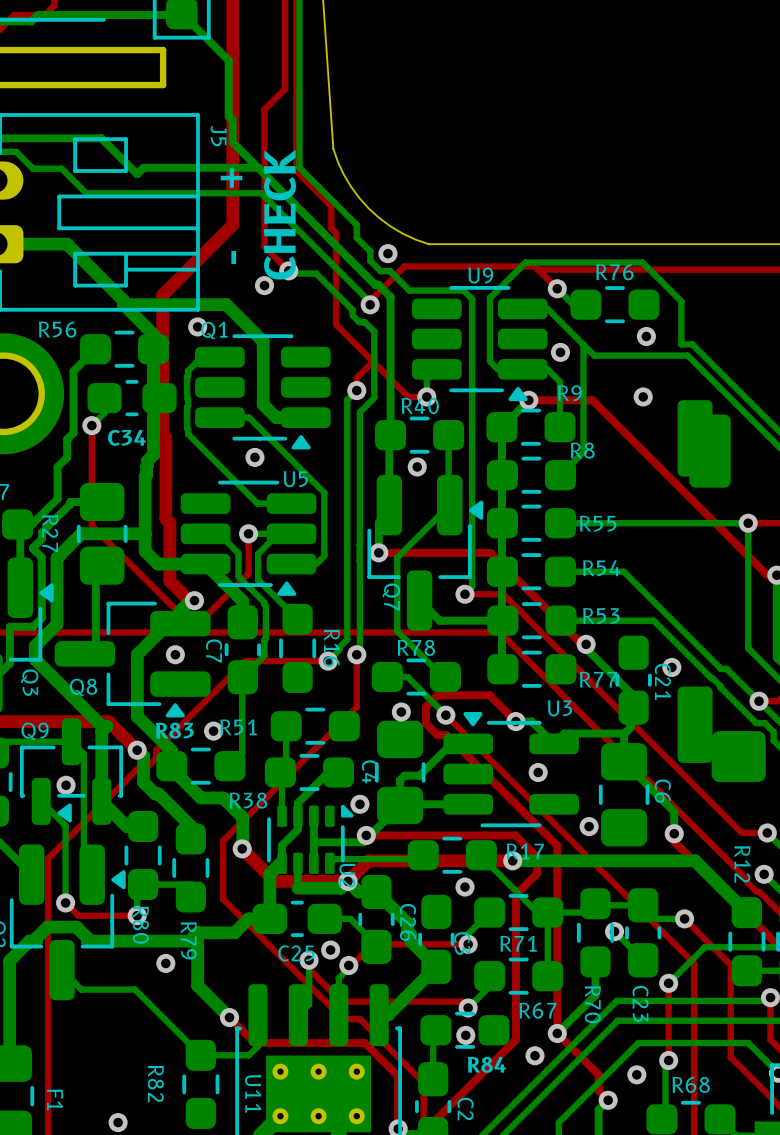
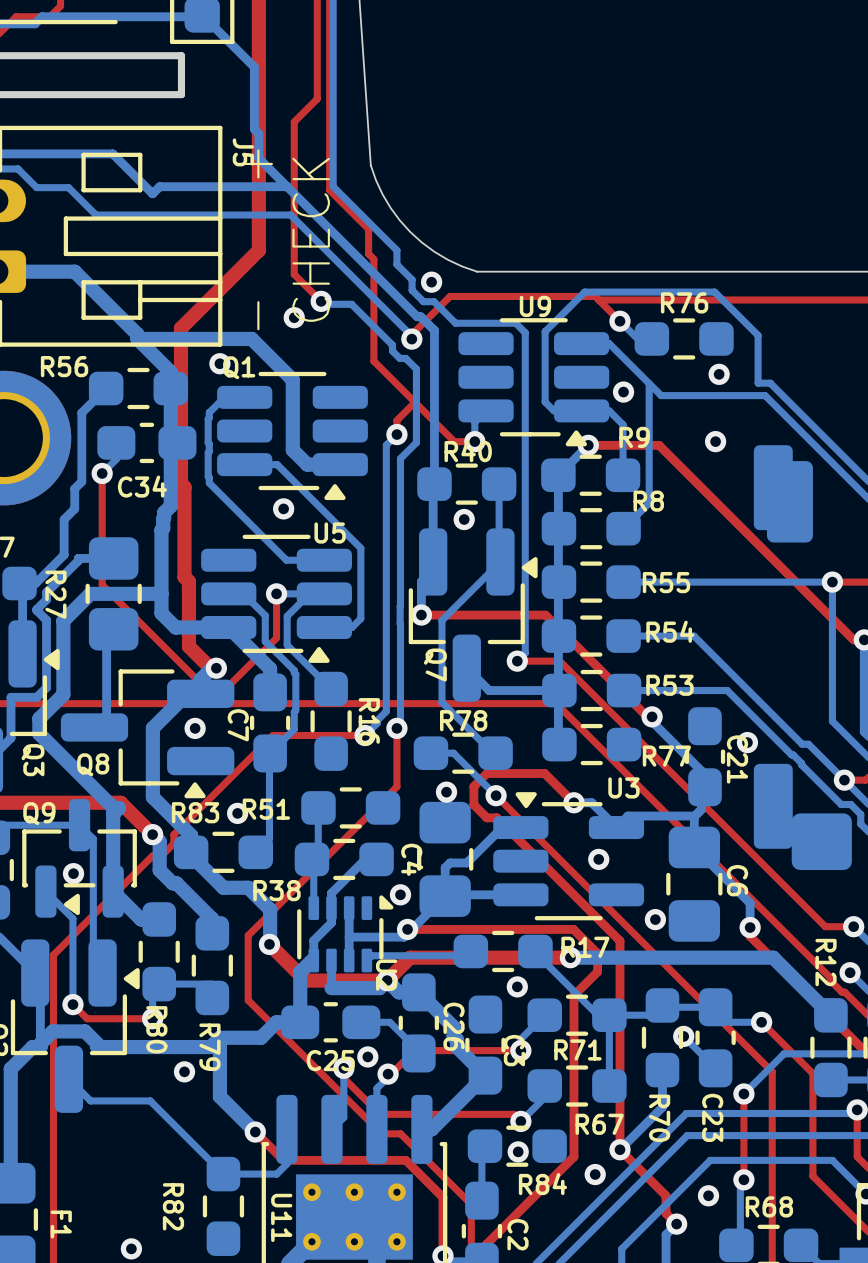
bottom track: none -> (40, 1006) (40, 1043)

